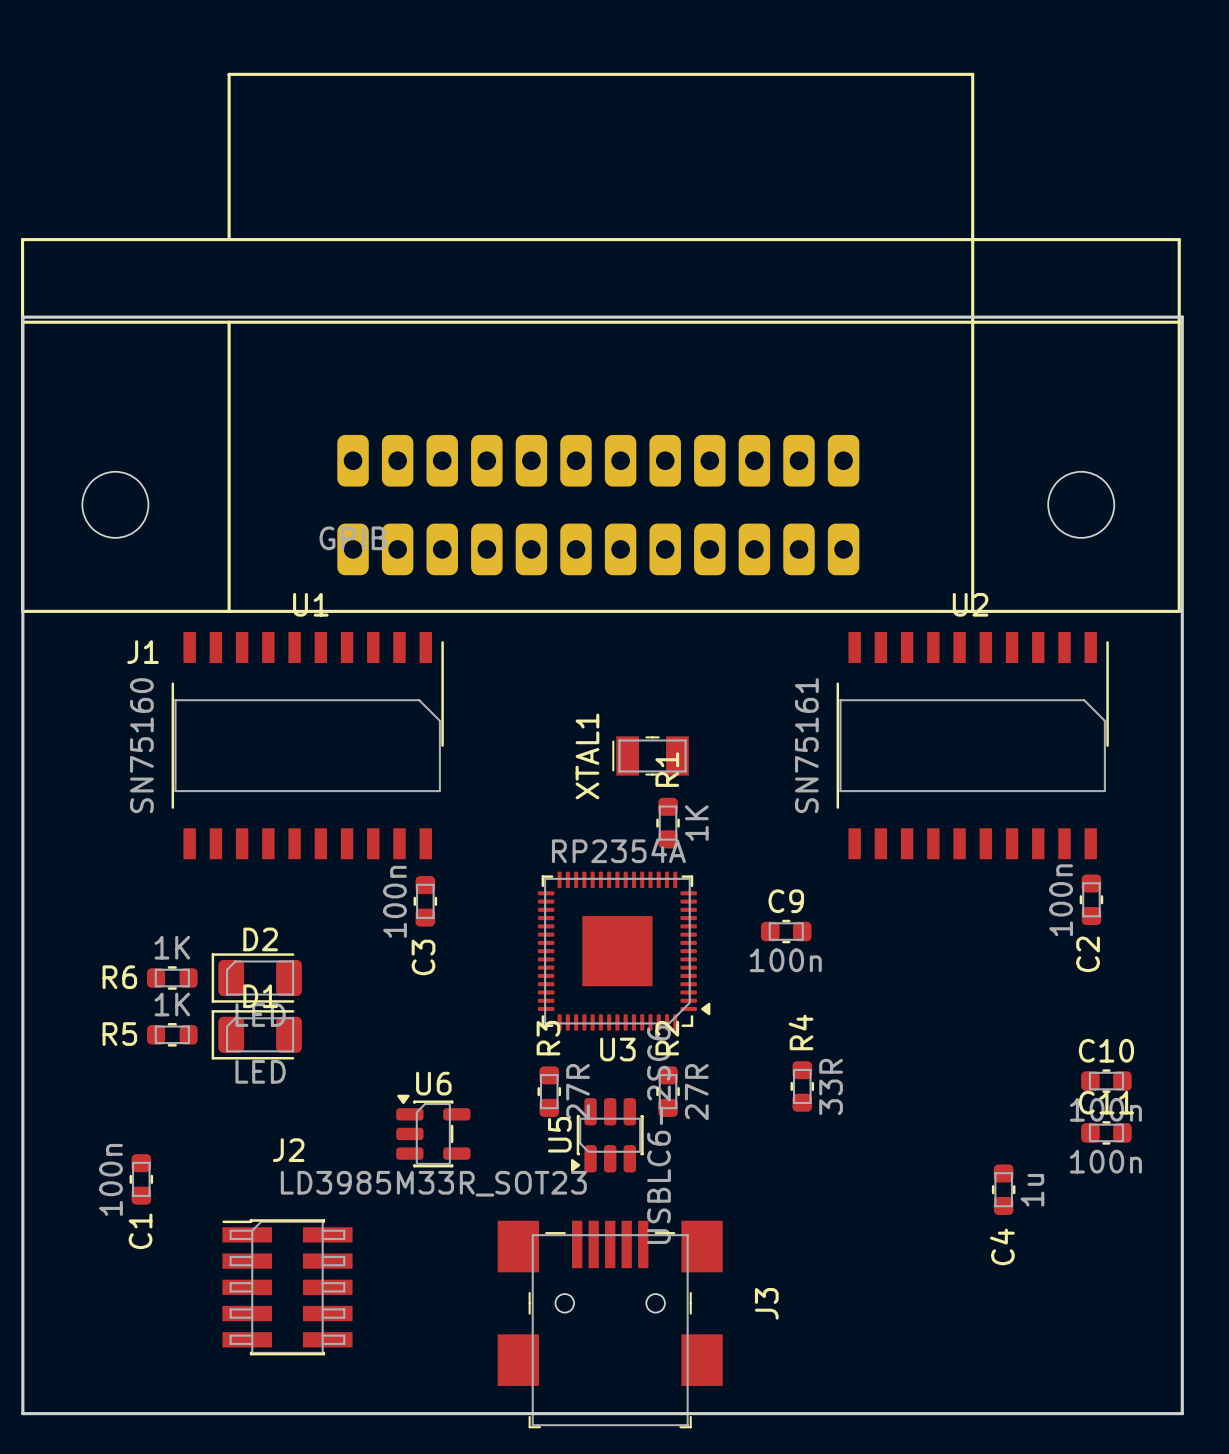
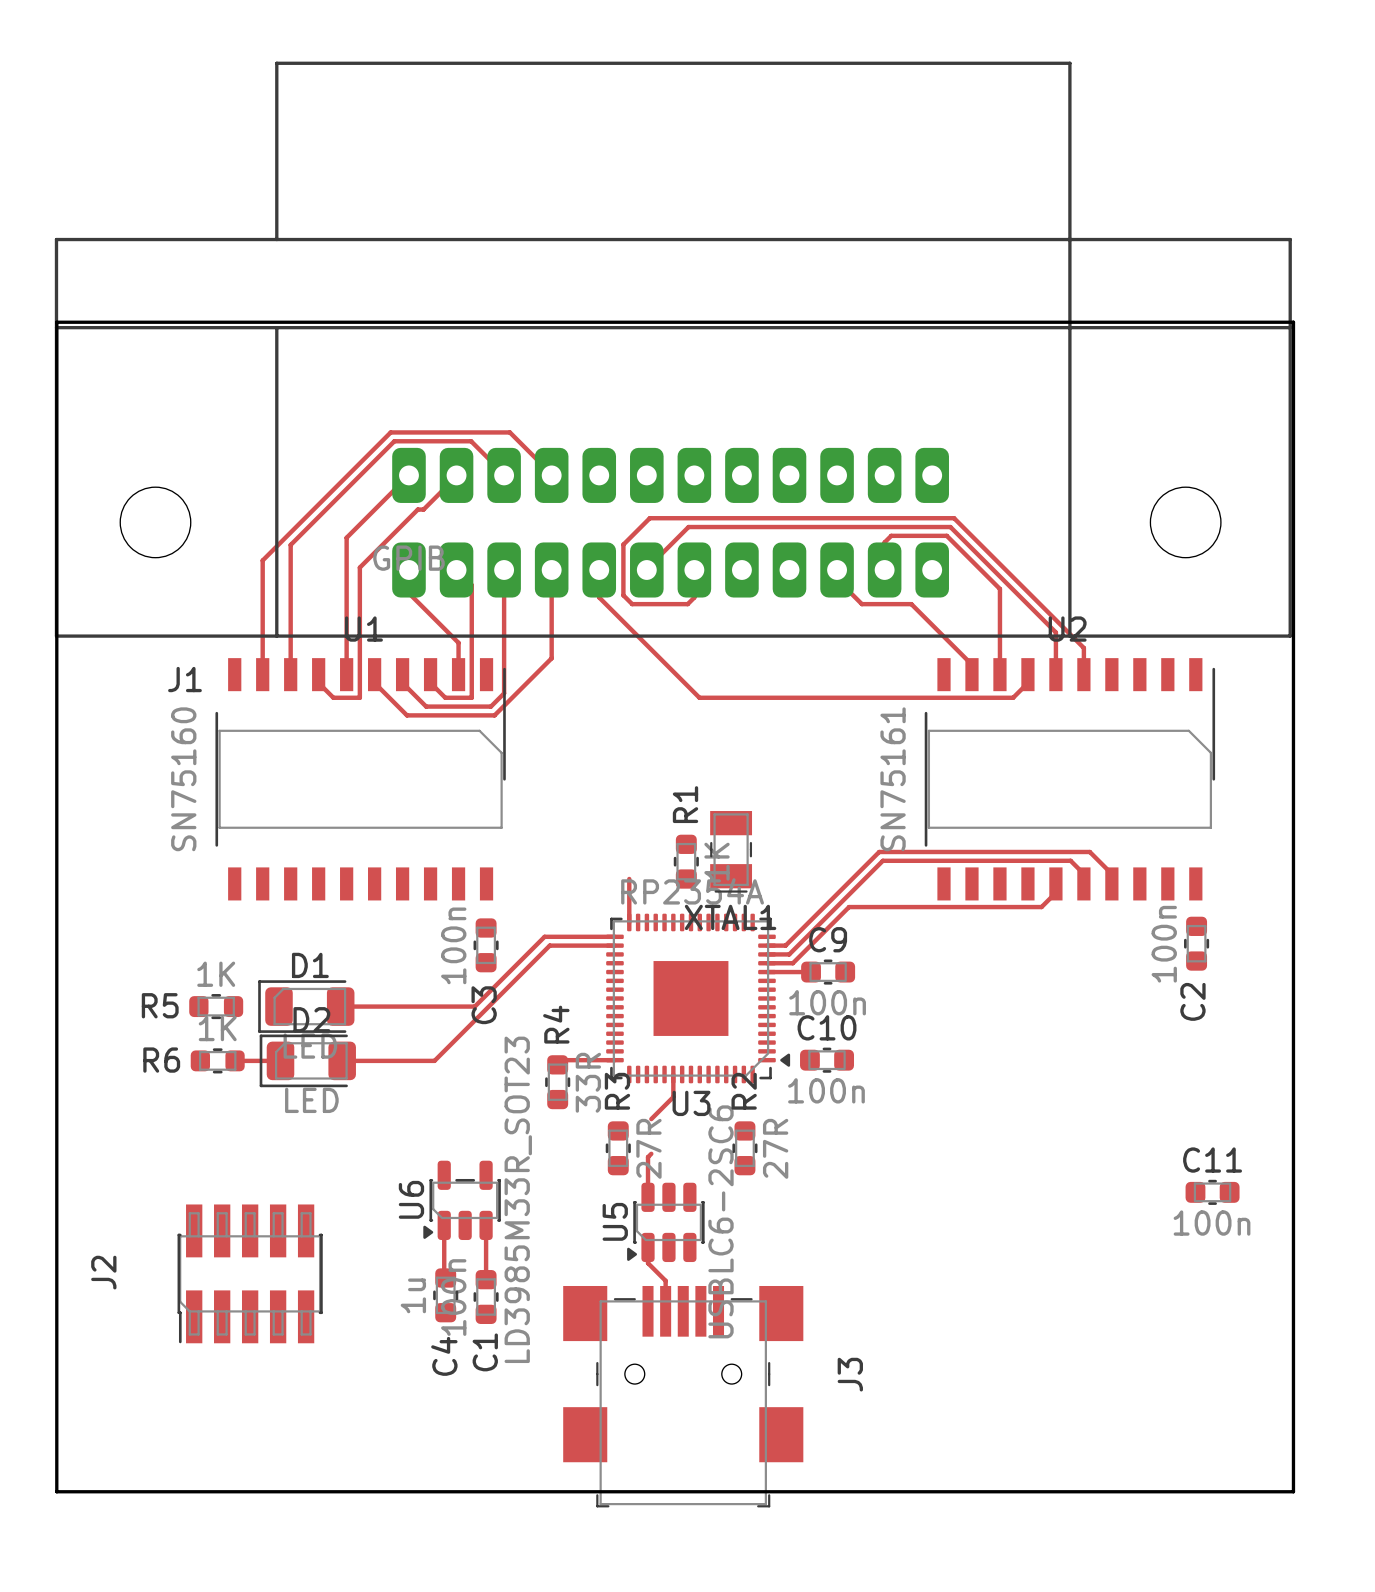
top track: none -> (408, 475) (346, 537) (346, 674)
top track: none -> (456, 475) (423, 509) (417, 509) (359, 567) (359, 697) (333, 697) (318, 683) (318, 674)
top track: none -> (504, 475) (471, 441) (394, 441) (290, 544) (290, 674)
top track: none -> (551, 475) (509, 432) (390, 432) (262, 560) (262, 674)
top track: none -> (408, 569) (408, 593) (458, 642) (458, 674)
top track: none -> (456, 569) (471, 585) (471, 697) (445, 697) (430, 683) (430, 674)
top track: none -> (504, 569) (504, 693) (490, 706) (426, 706) (402, 683) (402, 674)
top track: none -> (551, 569) (551, 658) (494, 715) (407, 715) (374, 683) (374, 674)
top track: none -> (599, 569) (599, 597) (699, 697) (1013, 697) (1027, 683) (1027, 674)
top track: none -> (646, 569) (688, 527) (950, 527) (1055, 632) (1055, 674)
top track: none -> (694, 569) (694, 597) (687, 604) (632, 604) (623, 595) (623, 544) (649, 518) (954, 518) (1083, 648) (1083, 674)
top track: none -> (837, 569) (837, 579) (861, 604) (911, 604) (971, 664) (971, 674)
top track: none -> (884, 569) (884, 542) (891, 535) (946, 535) (999, 589) (999, 674)
XTAL1 rotation: 0° (650, 755) -> 90° counterclockwise (731, 851)
XTAL1 position: (650, 755) -> (731, 851)
R1 position: (668, 823) -> (686, 861)
top track: none -> (629, 878) (629, 922)
top track: none -> (1055, 883) (1055, 892) (1041, 907) (849, 907) (792, 963) (766, 963)
top track: none -> (1083, 883) (1083, 874) (1070, 860) (882, 860) (789, 954) (766, 954)
top track: none -> (1111, 883) (1111, 874) (1089, 851) (879, 851) (785, 945) (766, 945)
top track: none -> (614, 936) (544, 936) (474, 1006) (340, 1006)
top track: none -> (614, 945) (549, 945) (434, 1060) (342, 1060)
top track: none -> (766, 972) (811, 972)
C9 position: (786, 931) -> (828, 972)
R6 position: (172, 978) -> (217, 1060)
D2 position: (256, 978) -> (307, 1060)
top track: none -> (614, 1060) (562, 1060) (557, 1064)
top track: none -> (235, 1060) (280, 1060)
top track: none -> (673, 1074) (673, 1097) (651, 1119)
R5 position: (172, 1034) -> (216, 1006)
D1 position: (256, 1034) -> (306, 1006)
C10 position: (1106, 1081) -> (827, 1060)
R4 position: (802, 1086) -> (557, 1082)
top track: none -> (651, 1153) (648, 1157) (648, 1197)
U6 rotation: 0° (433, 1131) -> 90° counterclockwise (462, 1200)
U5 position: (607, 1135) -> (665, 1222)
top track: none -> (444, 1225) (445, 1277)
top track: none -> (486, 1225) (486, 1279)
C1 position: (141, 1179) -> (486, 1297)
top track: none -> (648, 1247) (648, 1263) (665, 1280) (665, 1311)
C4 position: (1003, 1189) -> (445, 1295)
C4 value position: 1u (1032, 1190) -> 1u (413, 1295)
J2 rotation: 0° (287, 1287) -> 90° counterclockwise (250, 1273)
J2 position: (287, 1287) -> (250, 1273)

